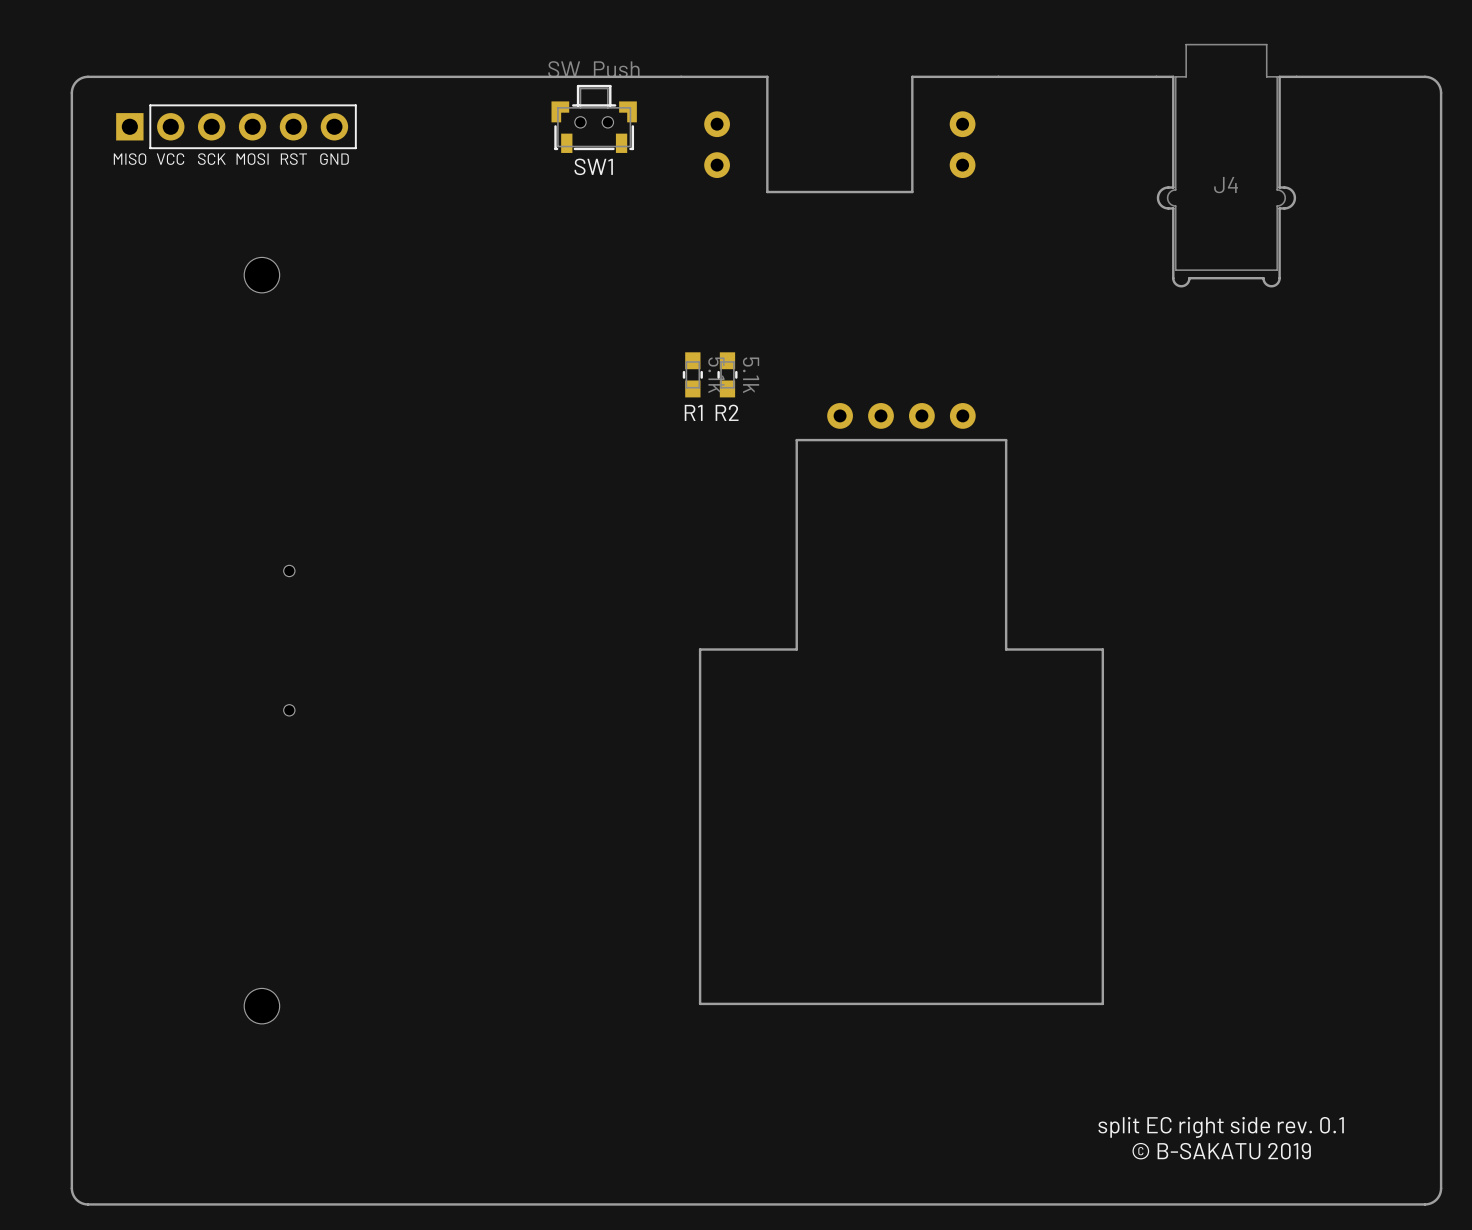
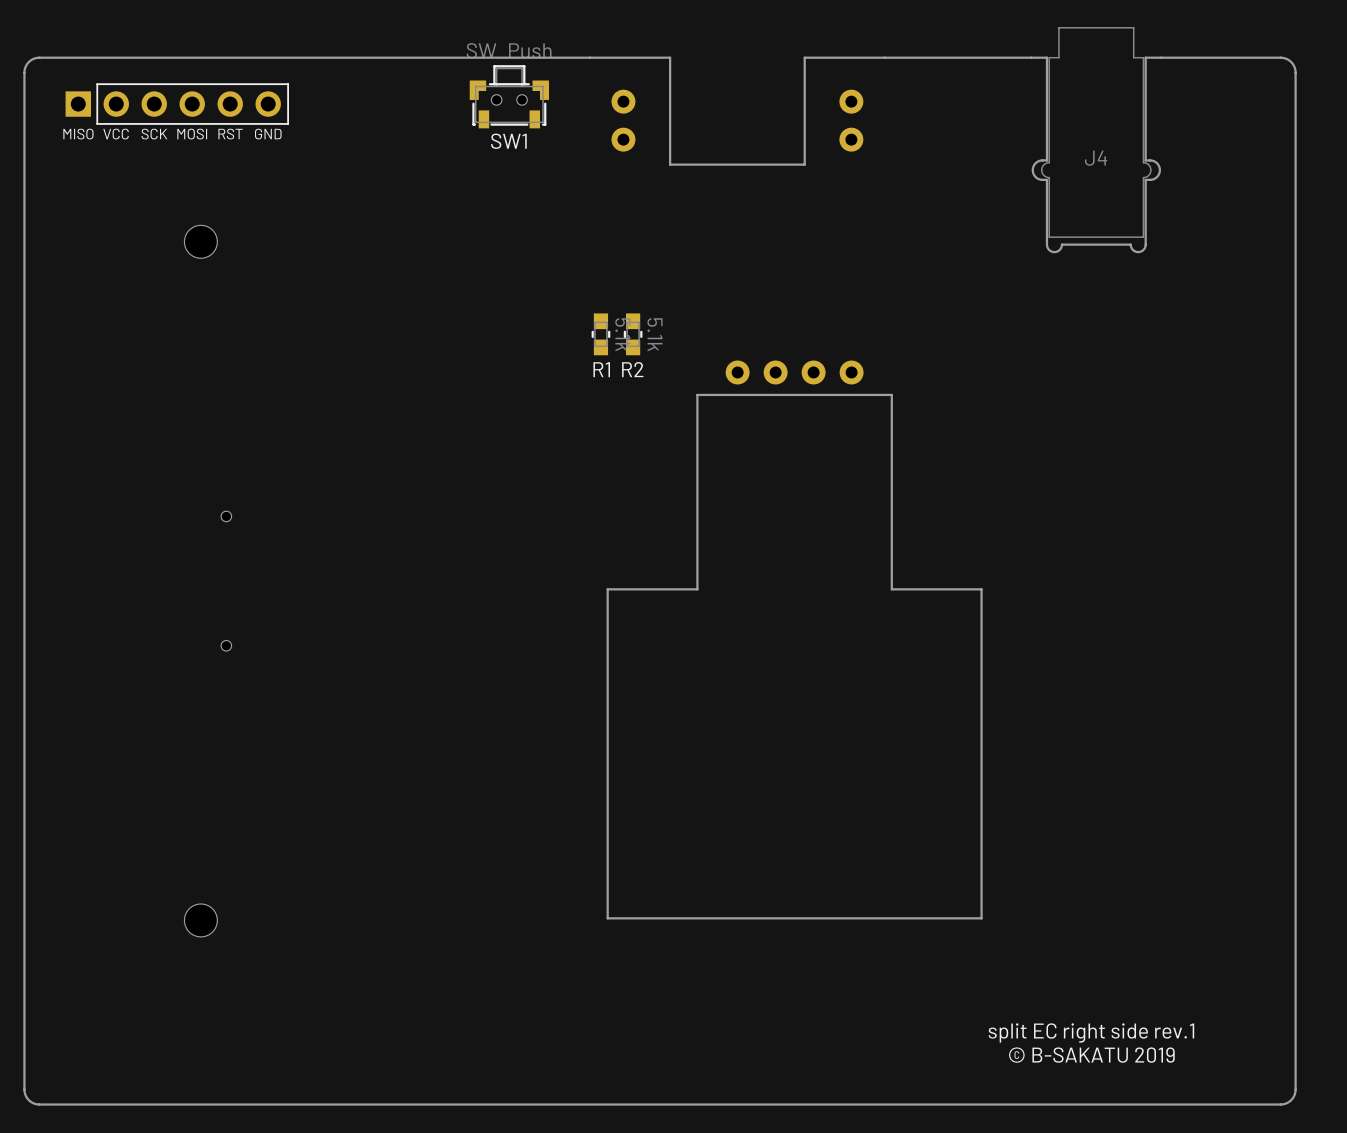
text: split EC right side rev. 0.1 (1221, 1127) -> split EC right side rev.1 (1091, 1033)

